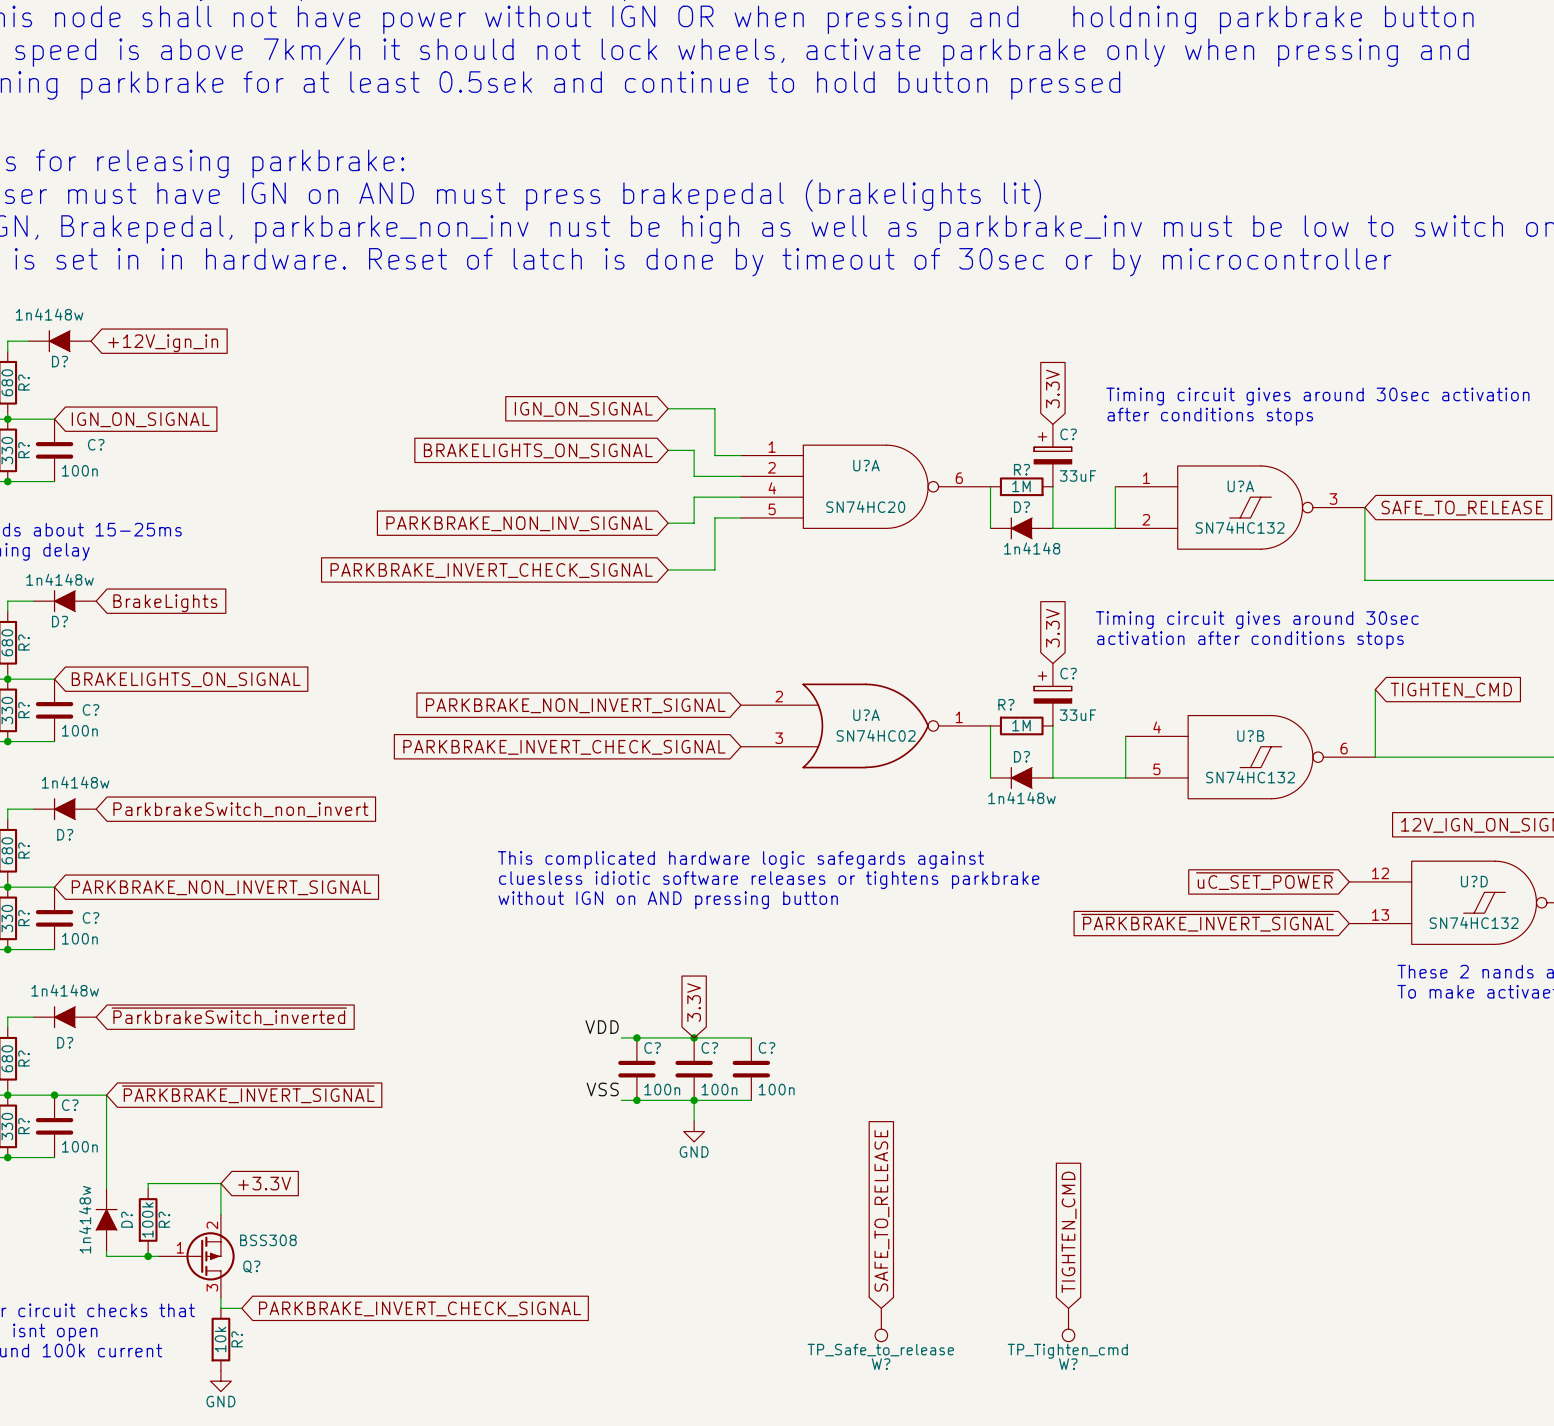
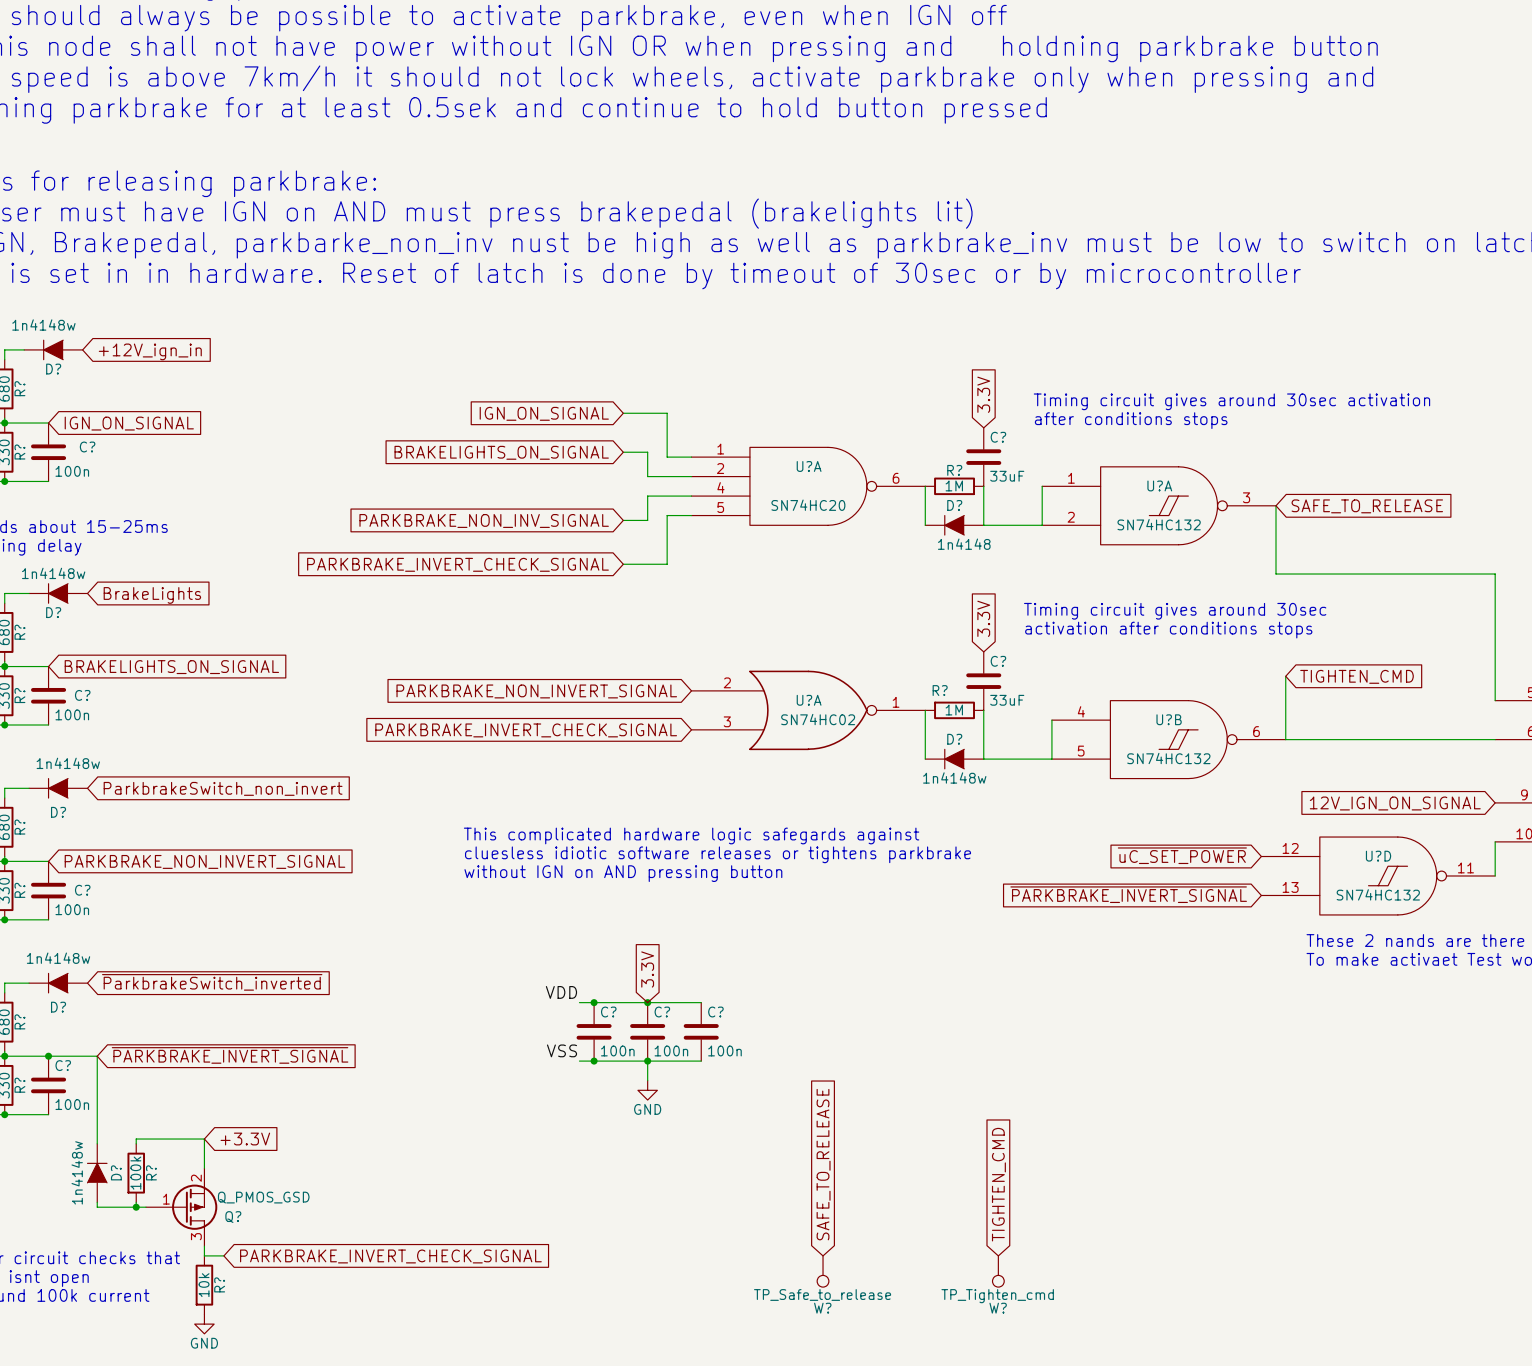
C? symbol: [1034, 424, 1072, 487] -> [966, 427, 1002, 487]
C? symbol: [1034, 663, 1072, 726] -> [966, 651, 1002, 711]
Q? value: BSS308 (268, 1240) -> Q_PMOS_GSD (263, 1197)

